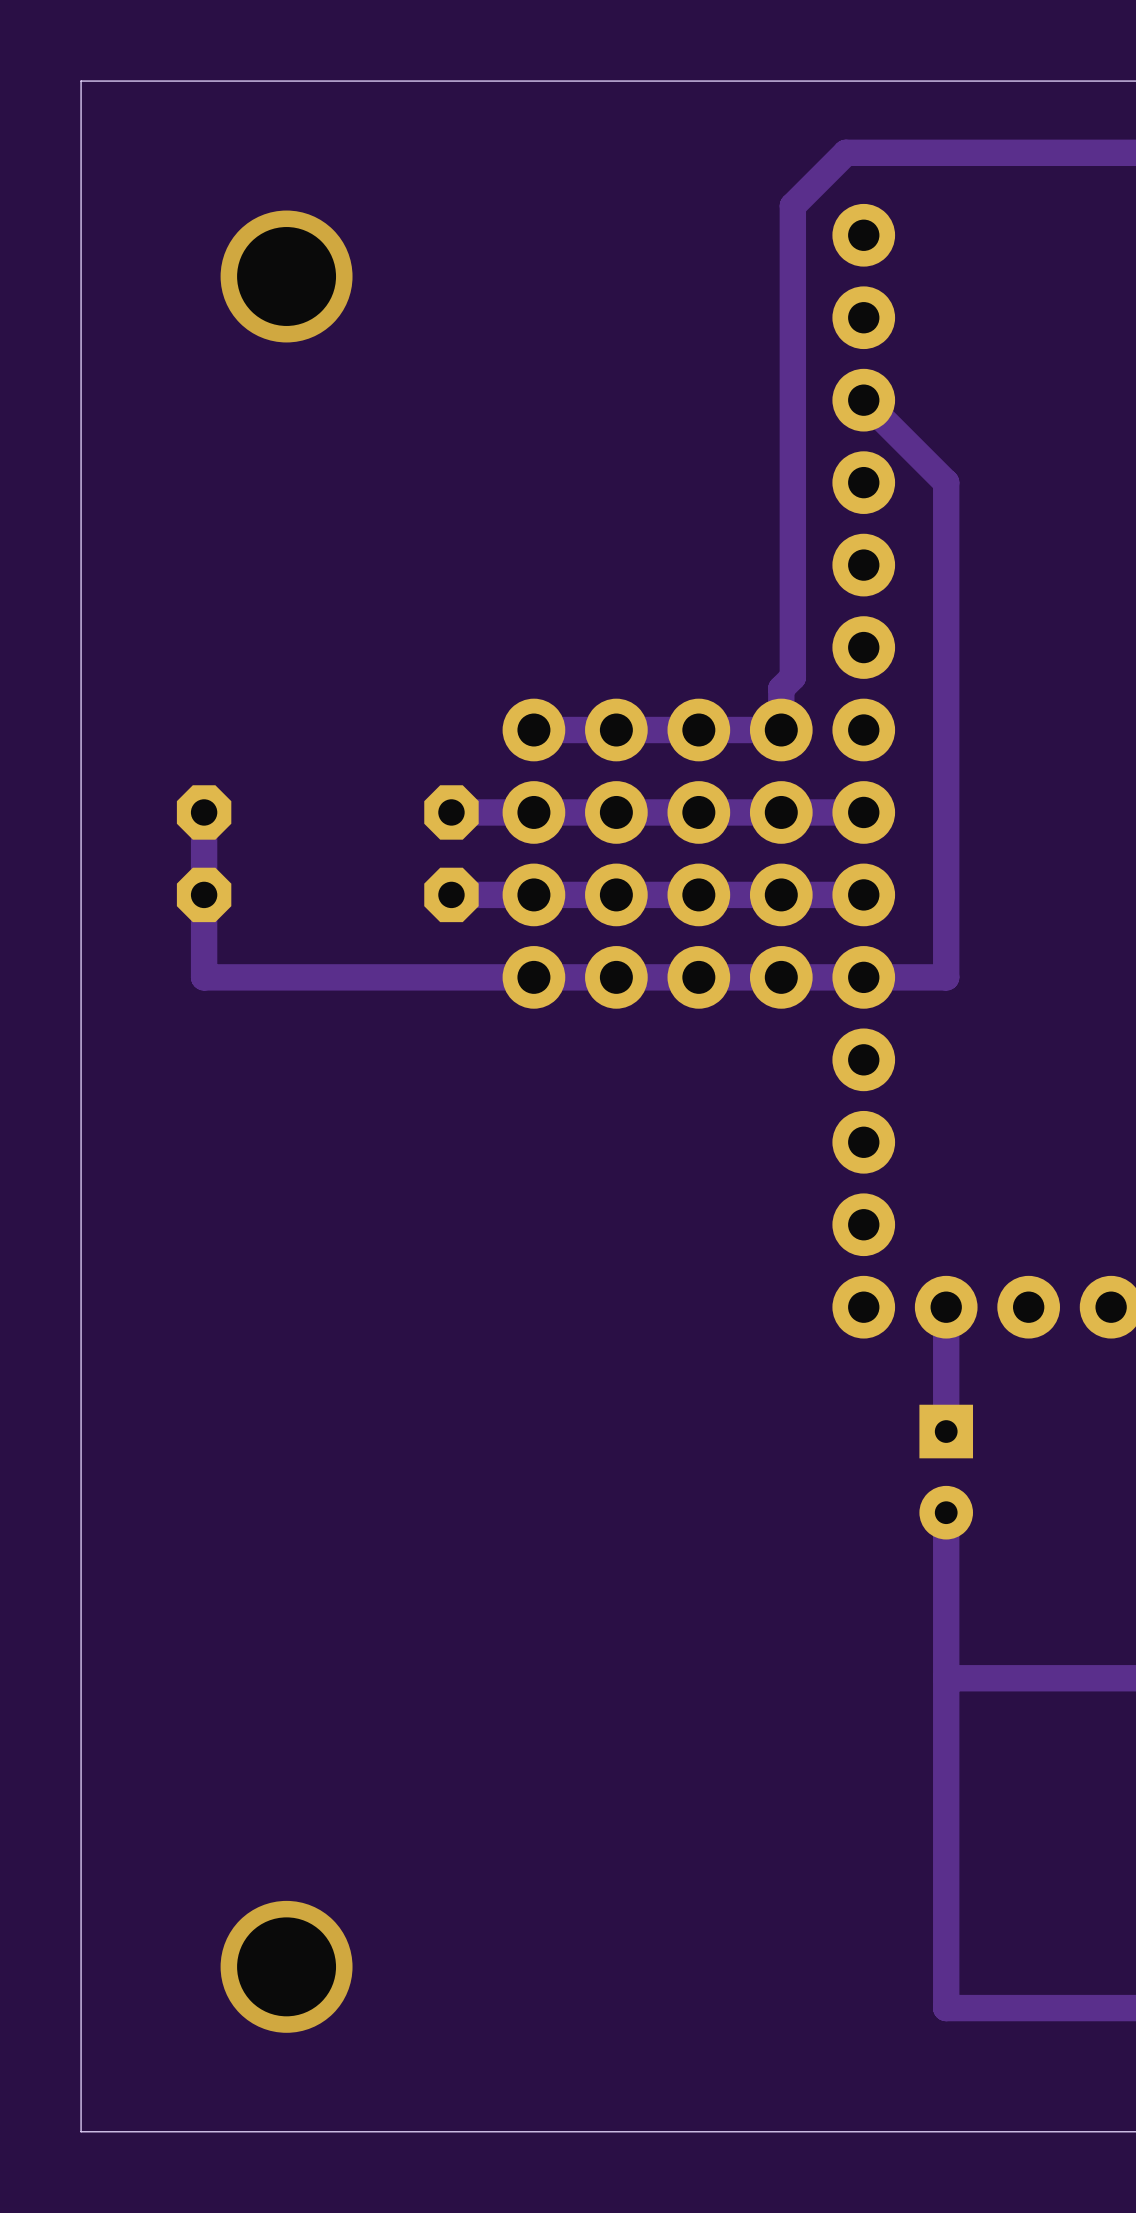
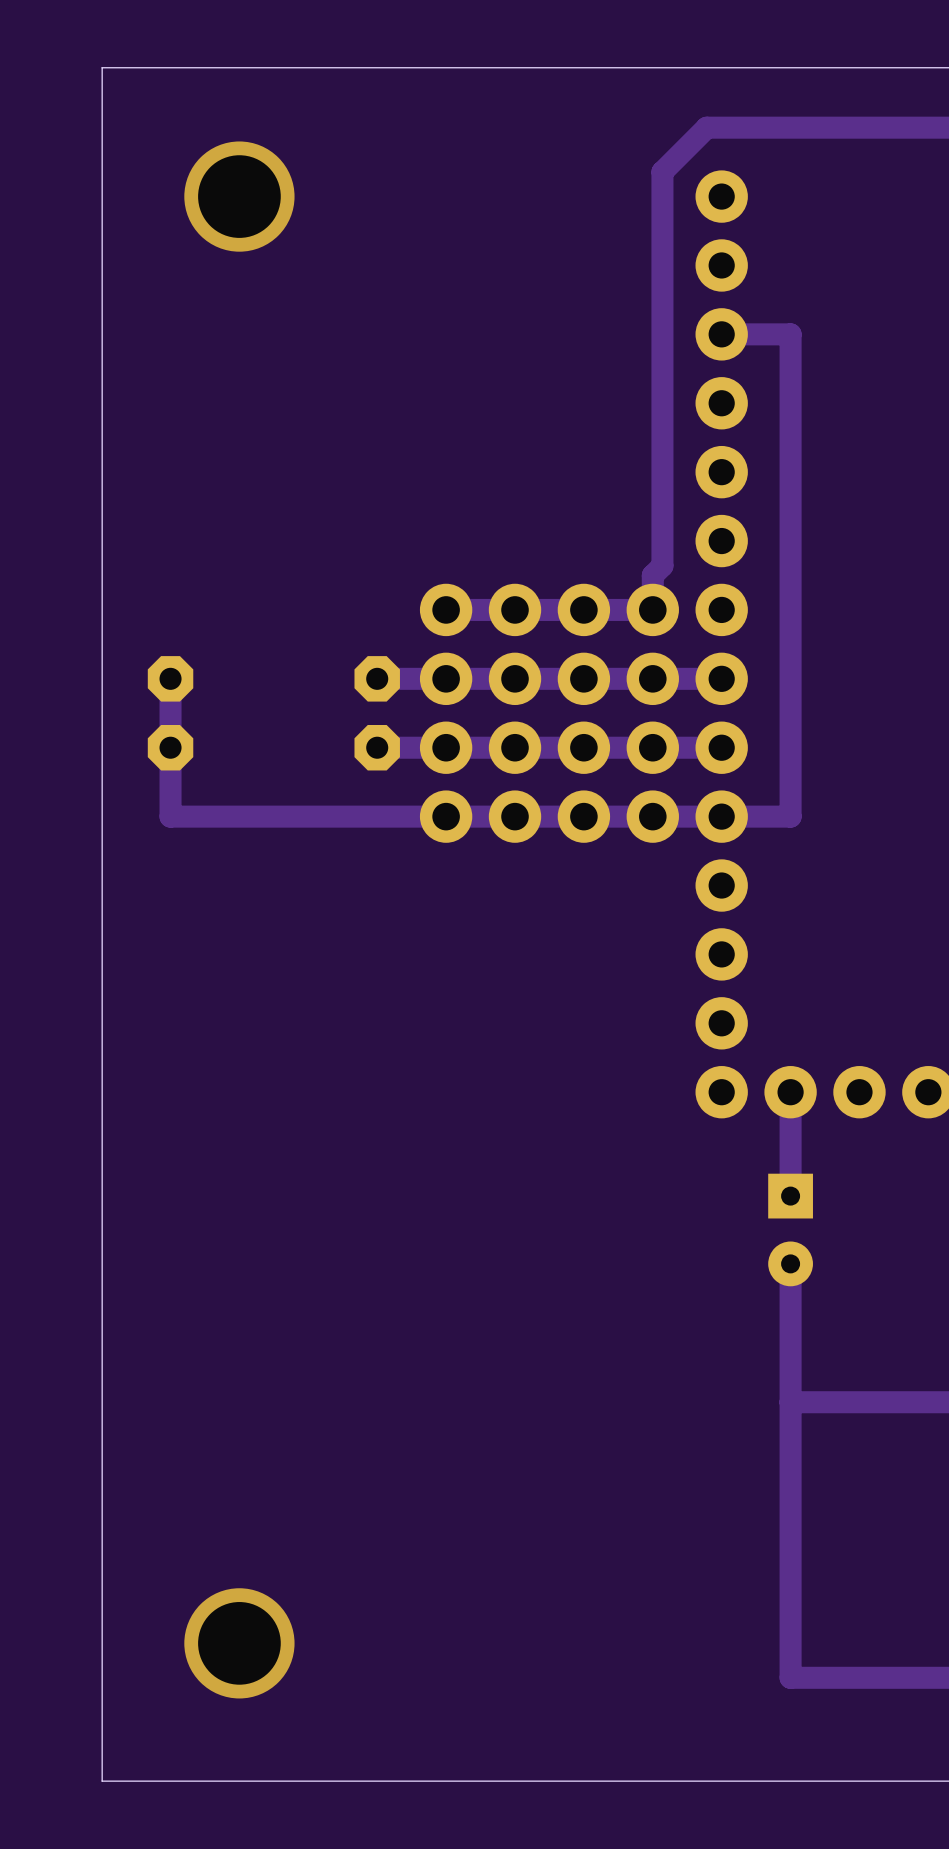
board edge: (122, 81) (81, 81) (81, 2131) (122, 2131) -> (102, 67) (102, 1781)
via position: (286, 276) -> (239, 196)
track: (863, 400) (946, 482) -> (721, 334) (790, 334) (790, 403)

